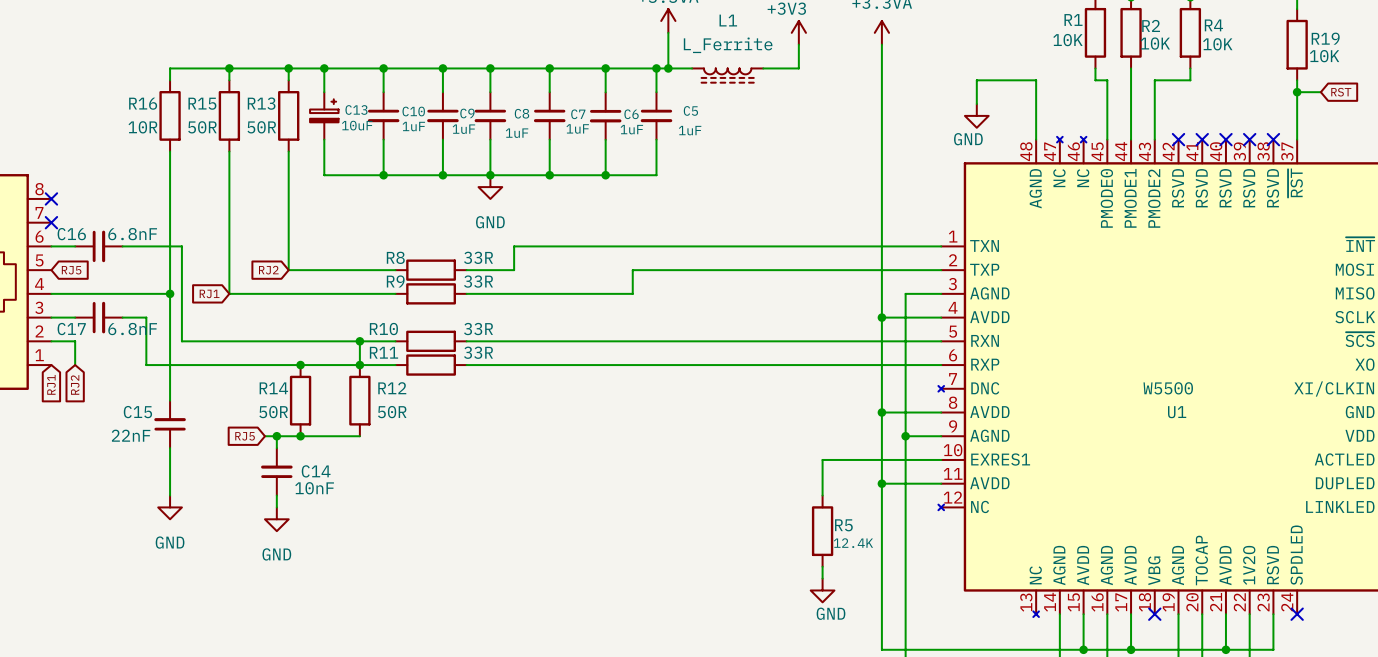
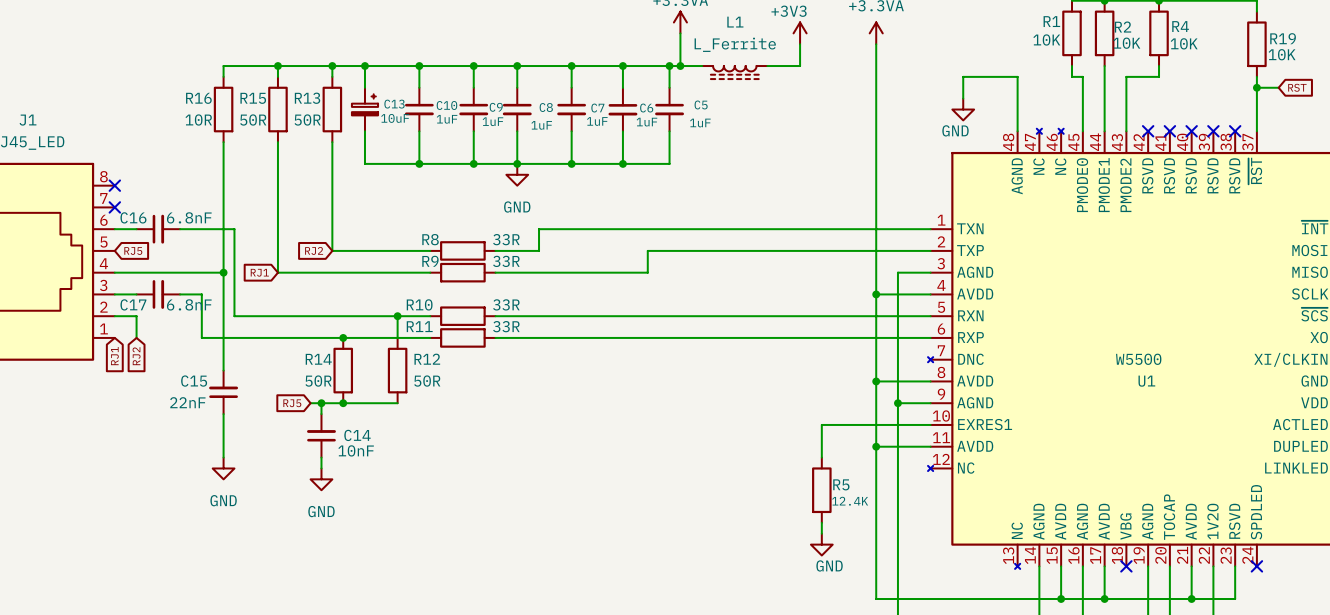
junction: (359, 365) -> none

